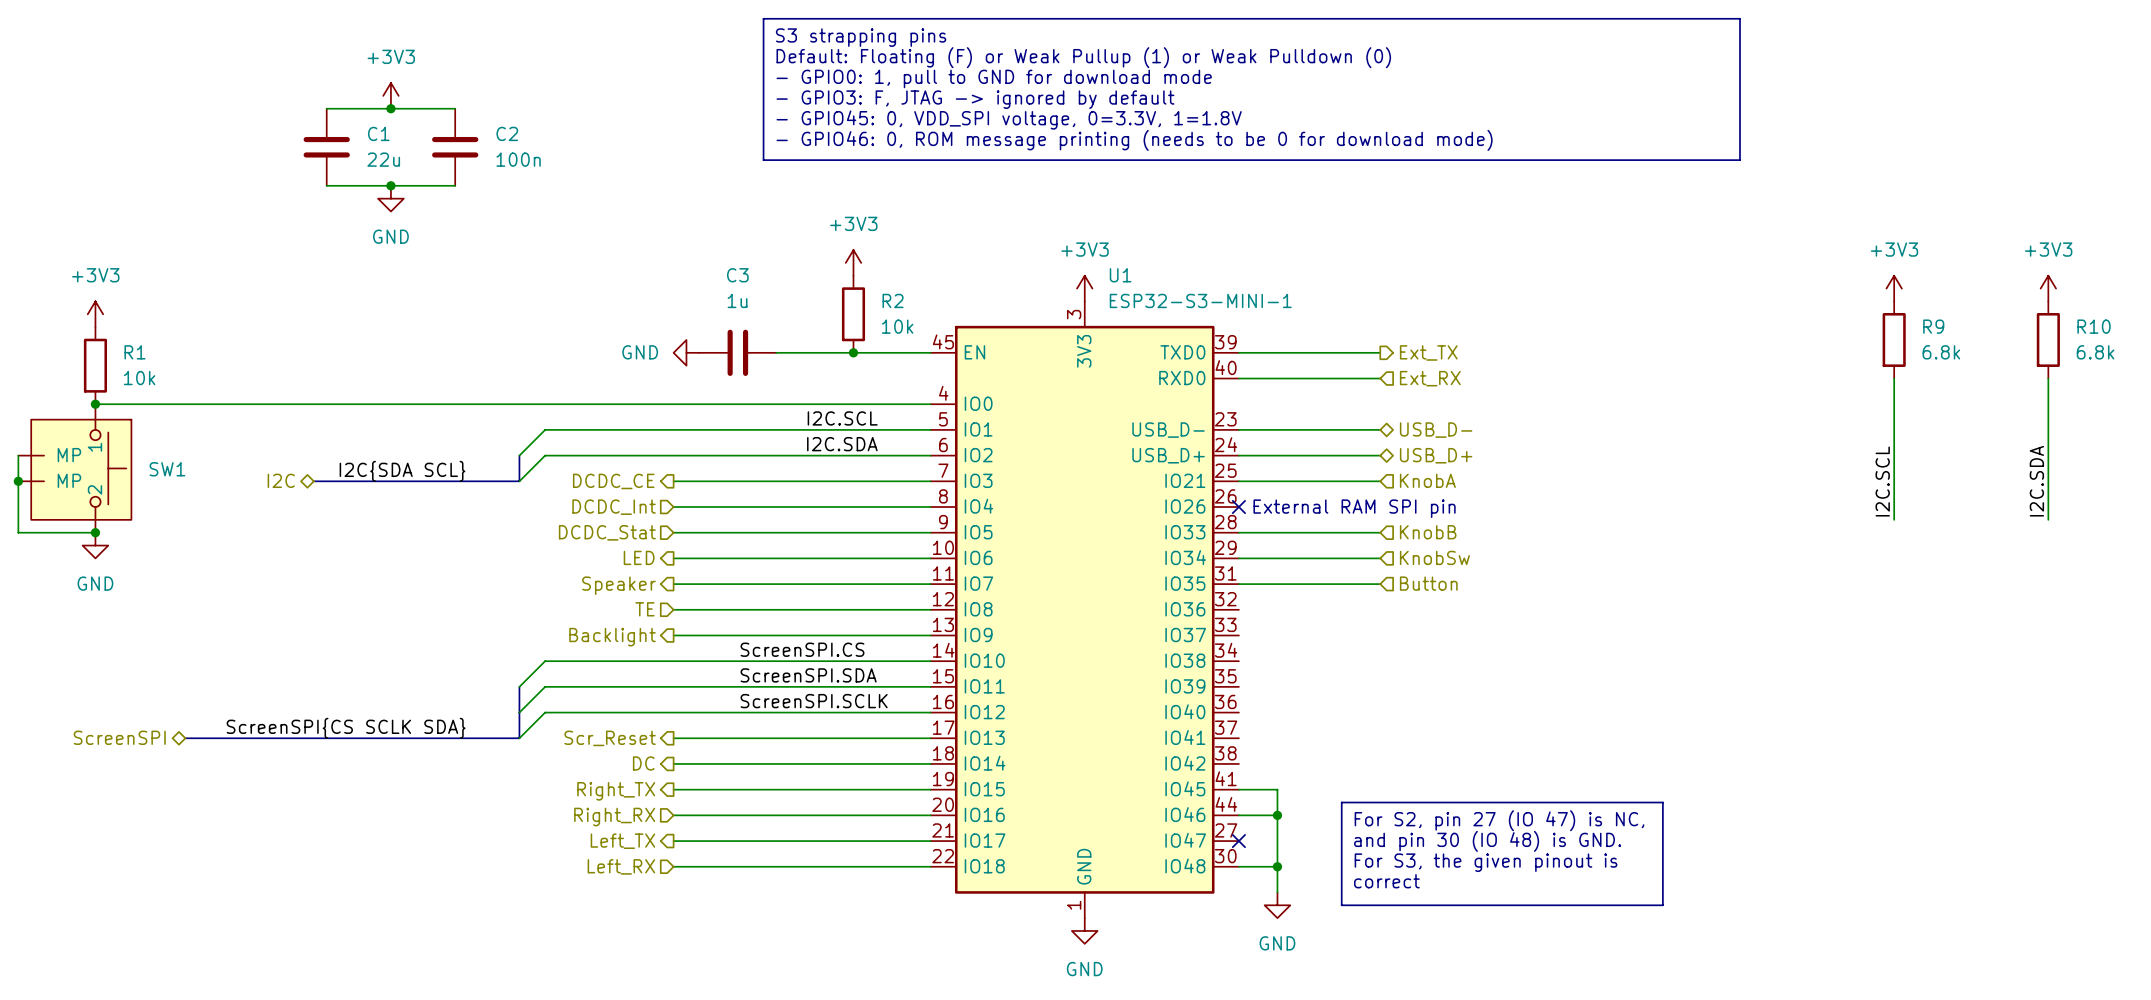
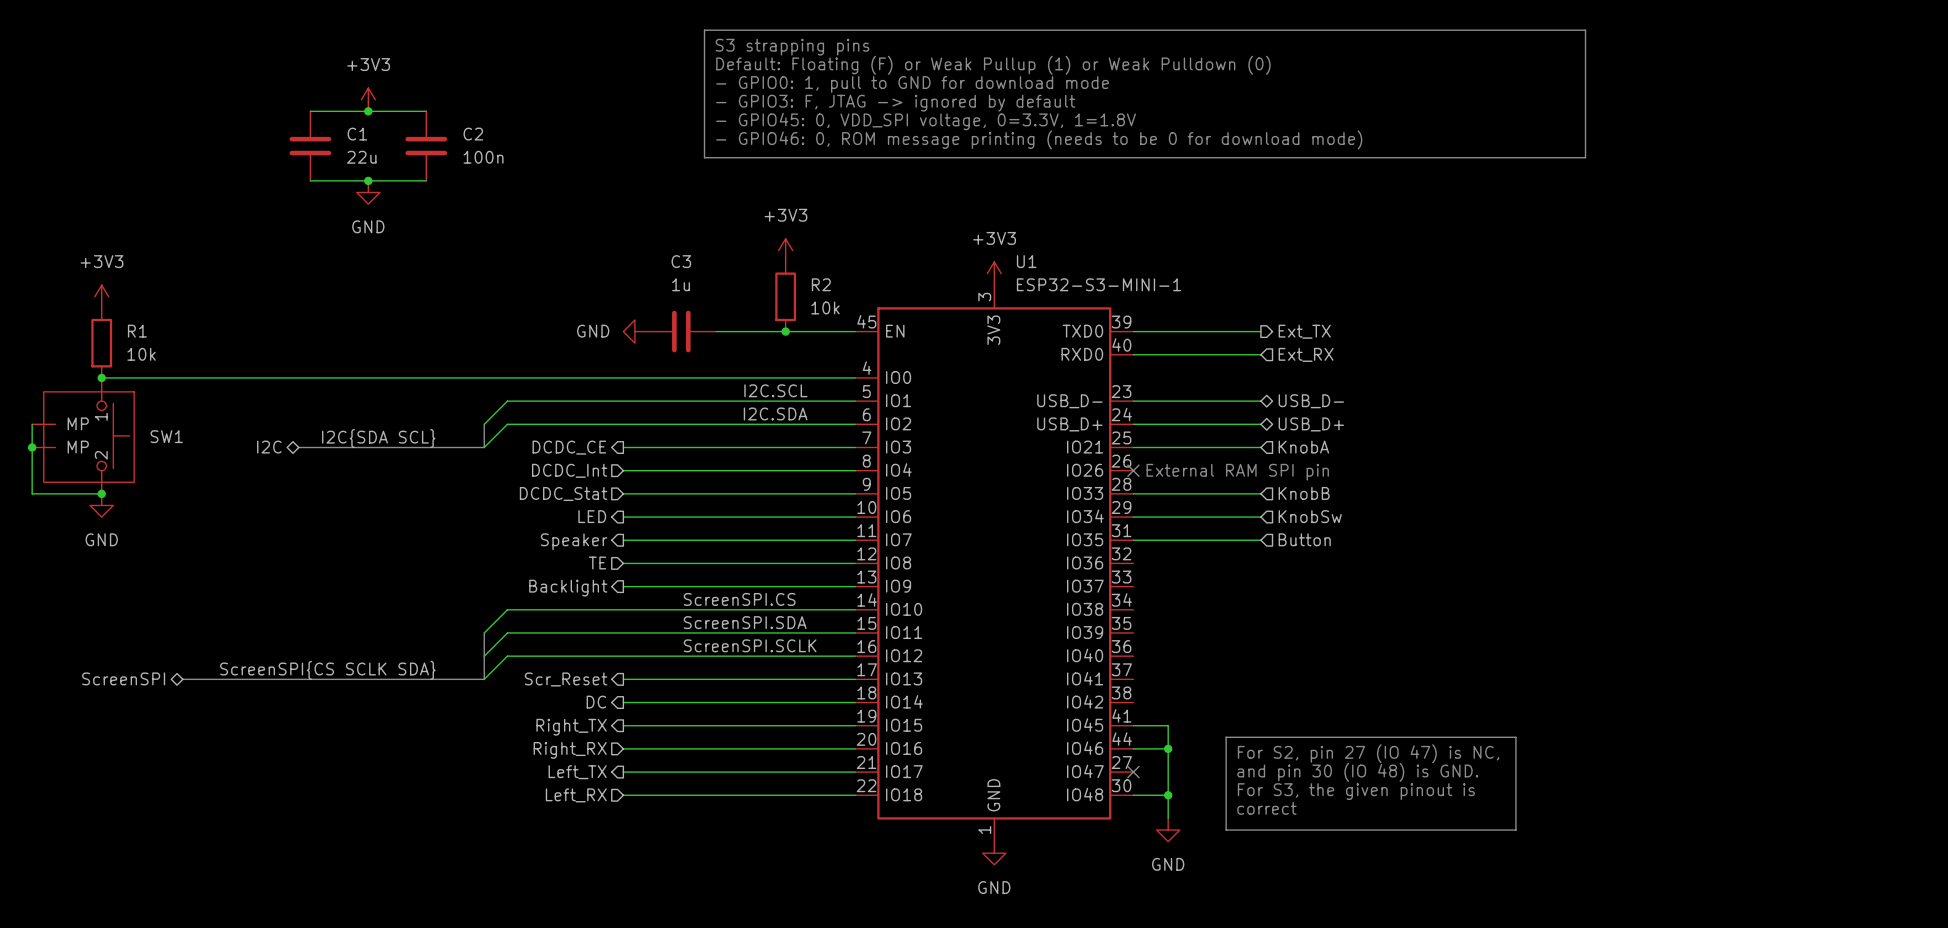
power symbol: +3V3 (1894, 288) -> none
power symbol: +3V3 (2048, 288) -> none
R9: 6.8k (1894, 339) -> none
R10: 6.8k (2048, 339) -> none
wire: (1894, 378) (1894, 519) -> none
wire: (2048, 378) (2048, 519) -> none
label: I2C.SCL (1882, 481) -> none
label: I2C.SDA (2036, 481) -> none

